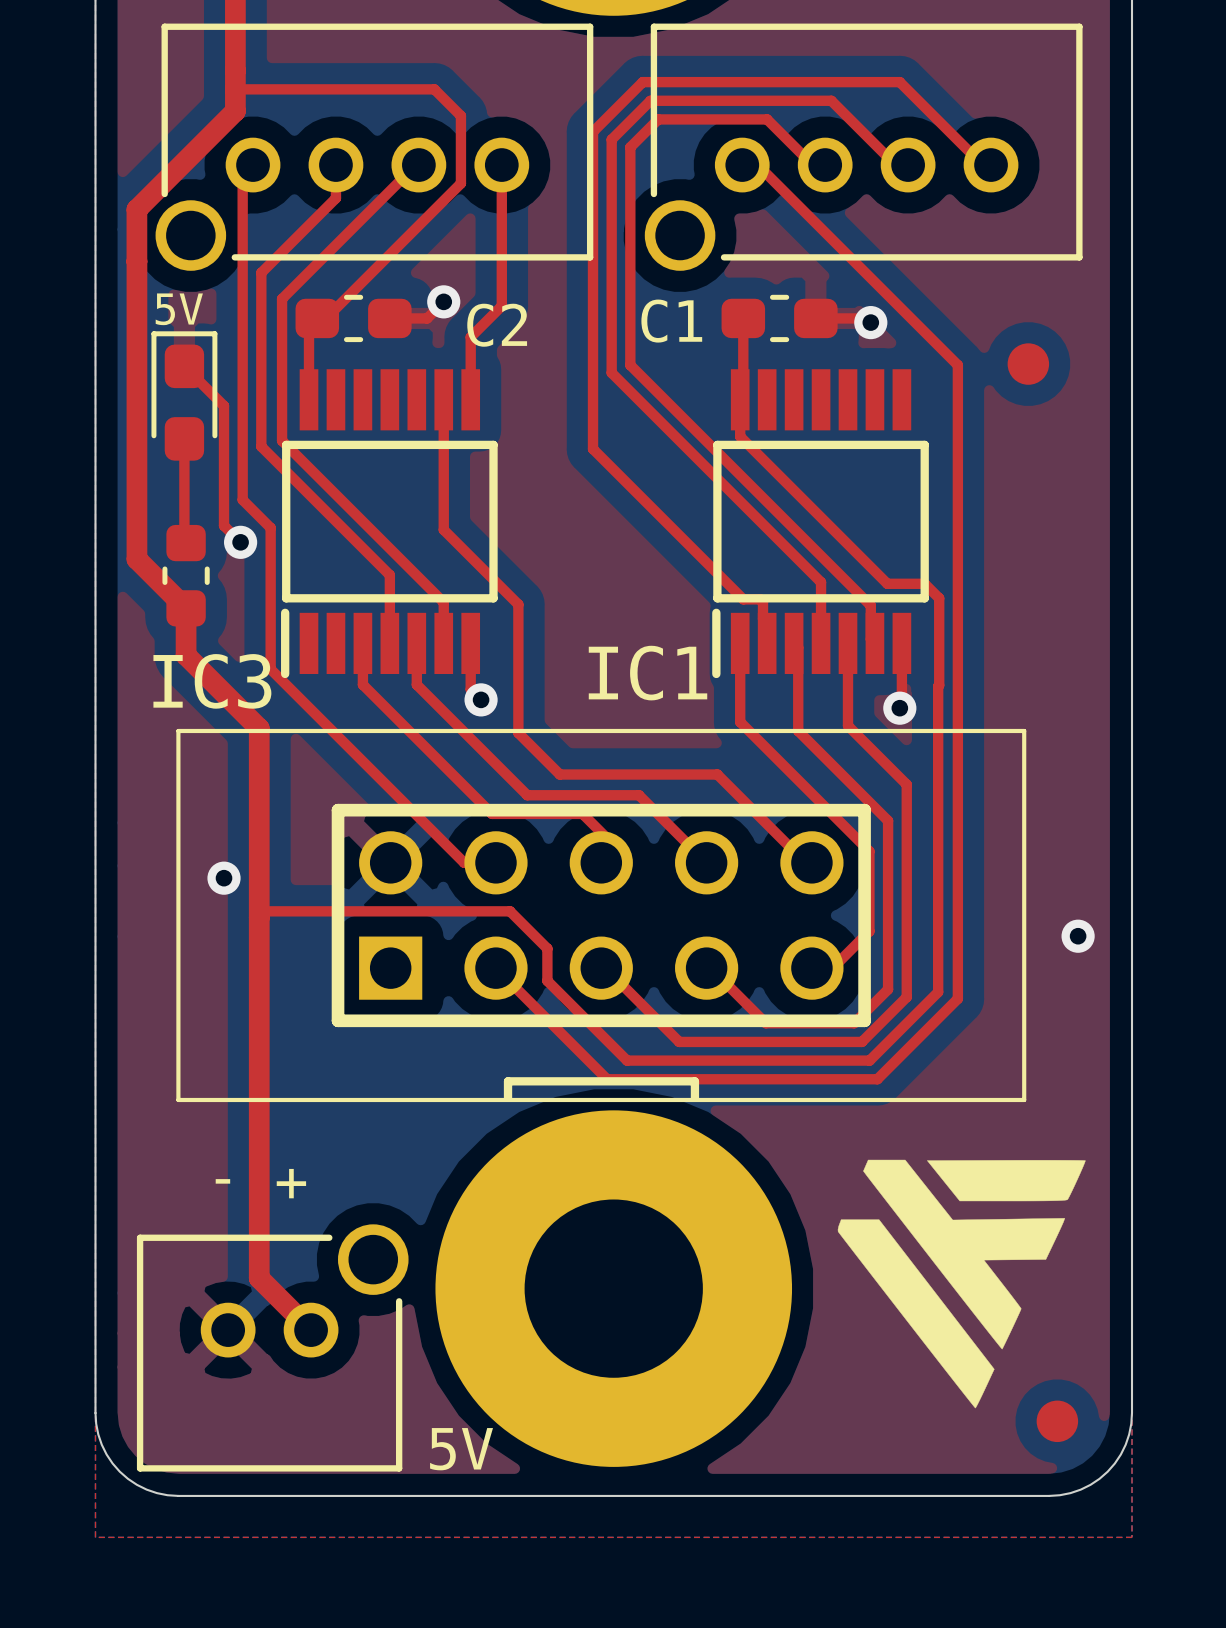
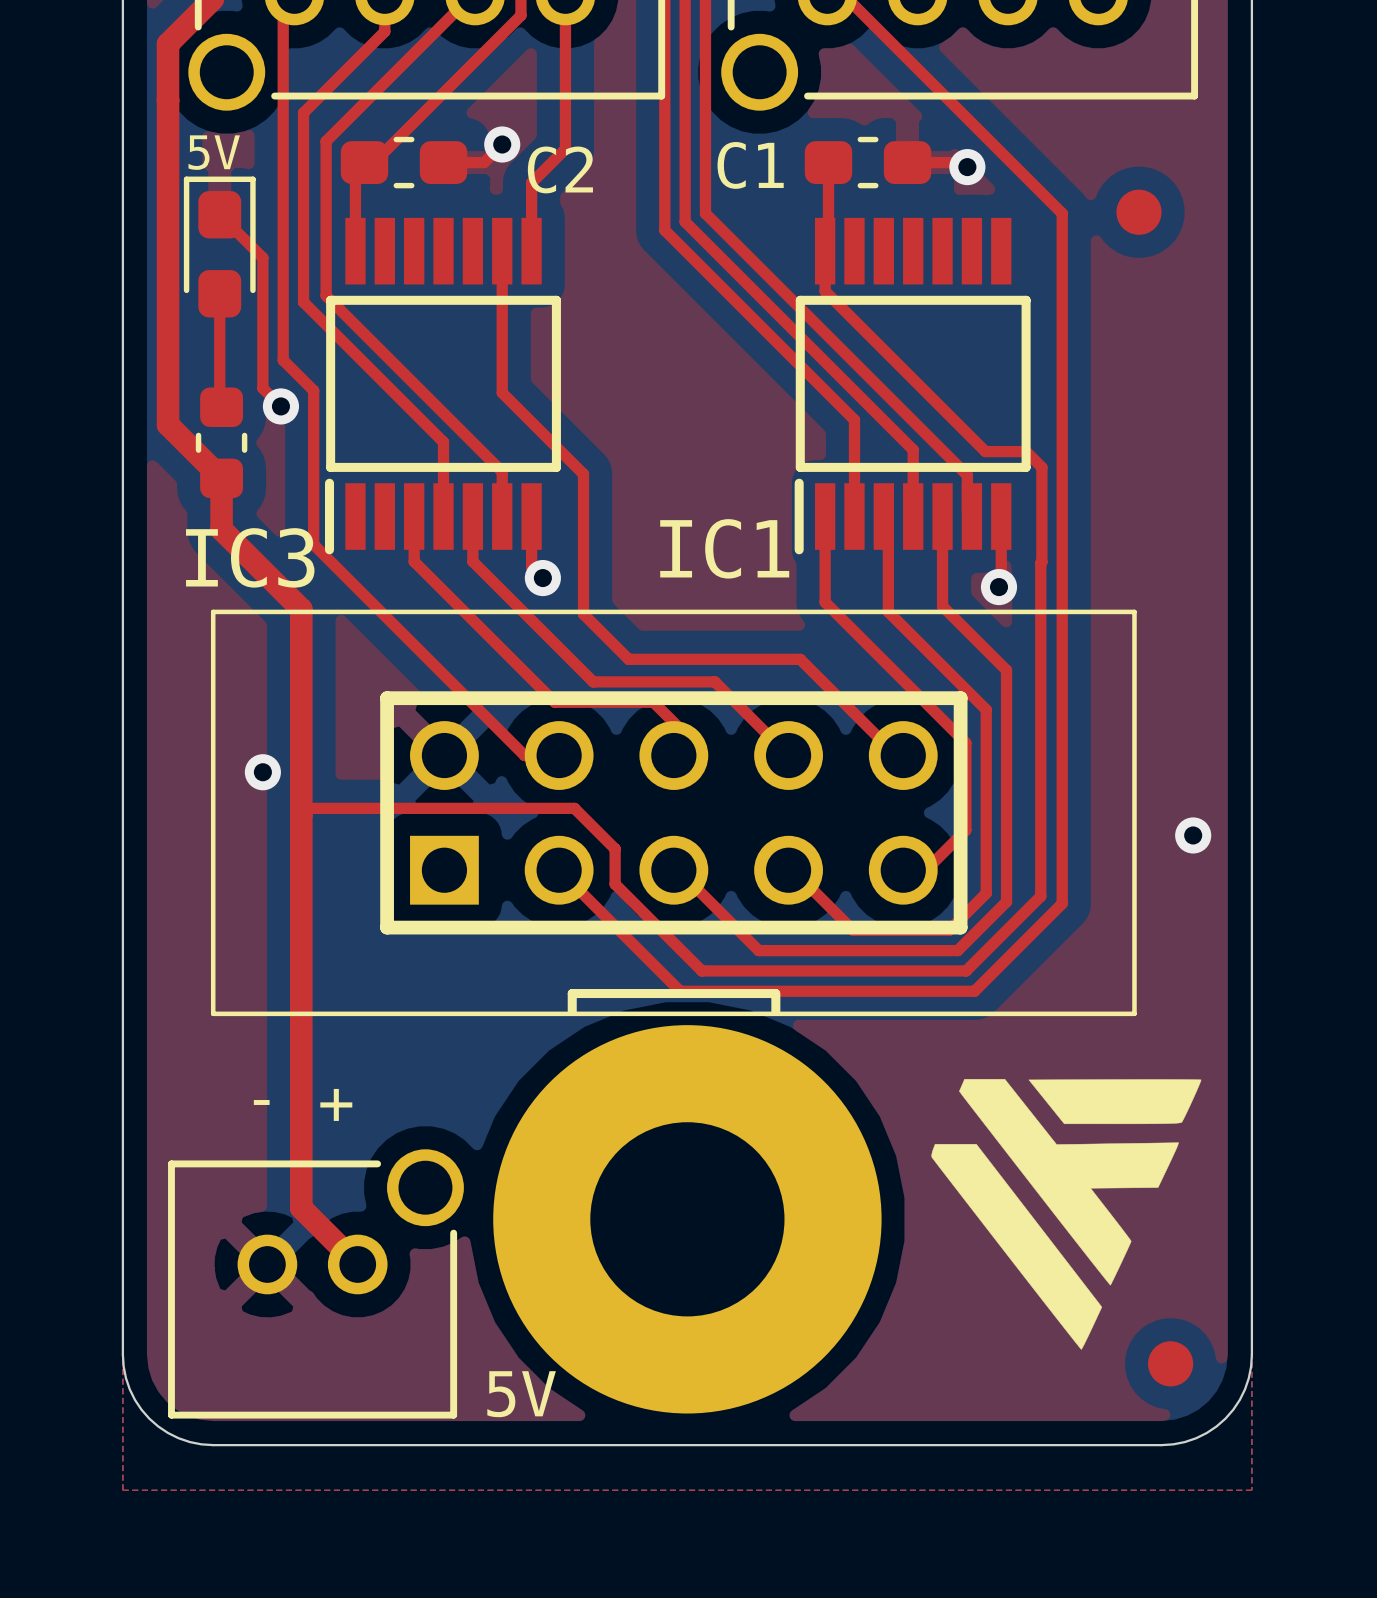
top track: (593, 380) (593, 449) (743, 599) (760, 599) (763, 602) (763, 619) (767, 623) -> (664, 230) (854, 419) (854, 494)

